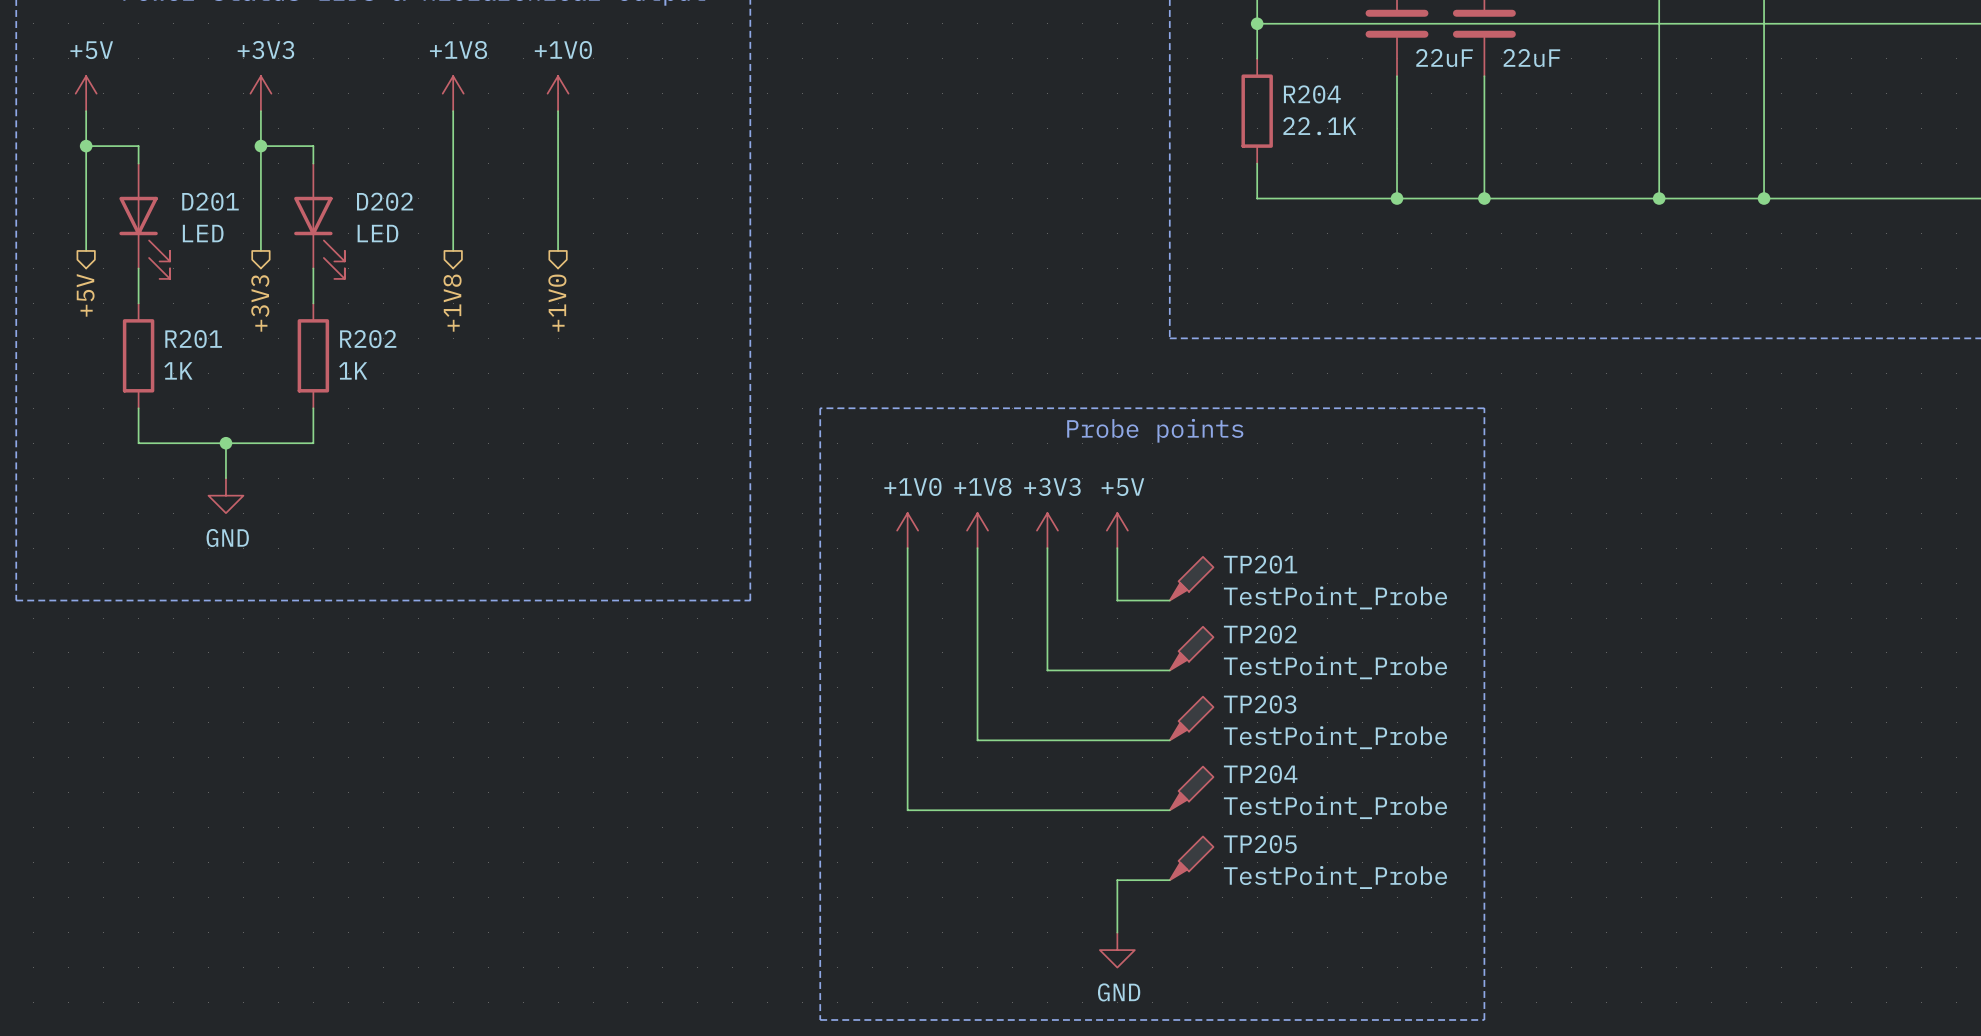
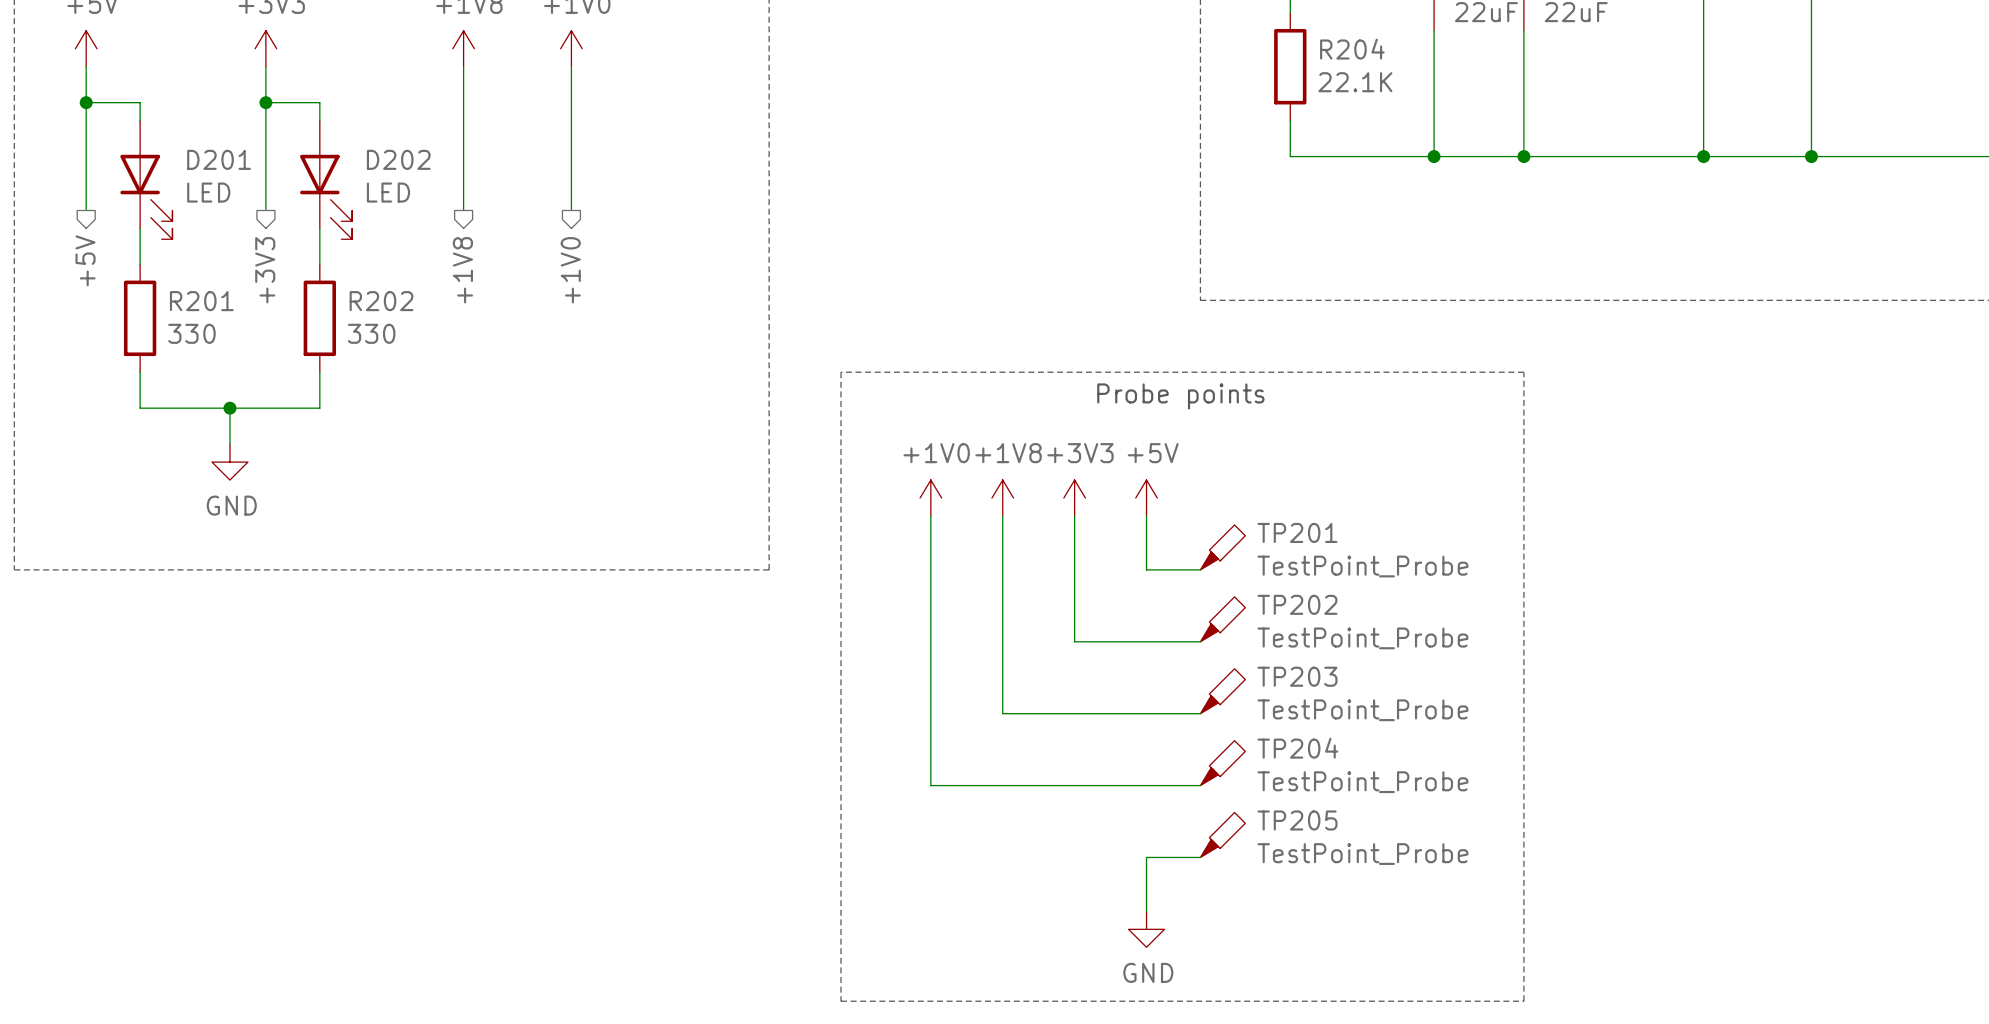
R201 value: 1K (178, 370) -> 330 (191, 333)
R202 value: 1K (353, 370) -> 330 (371, 333)

